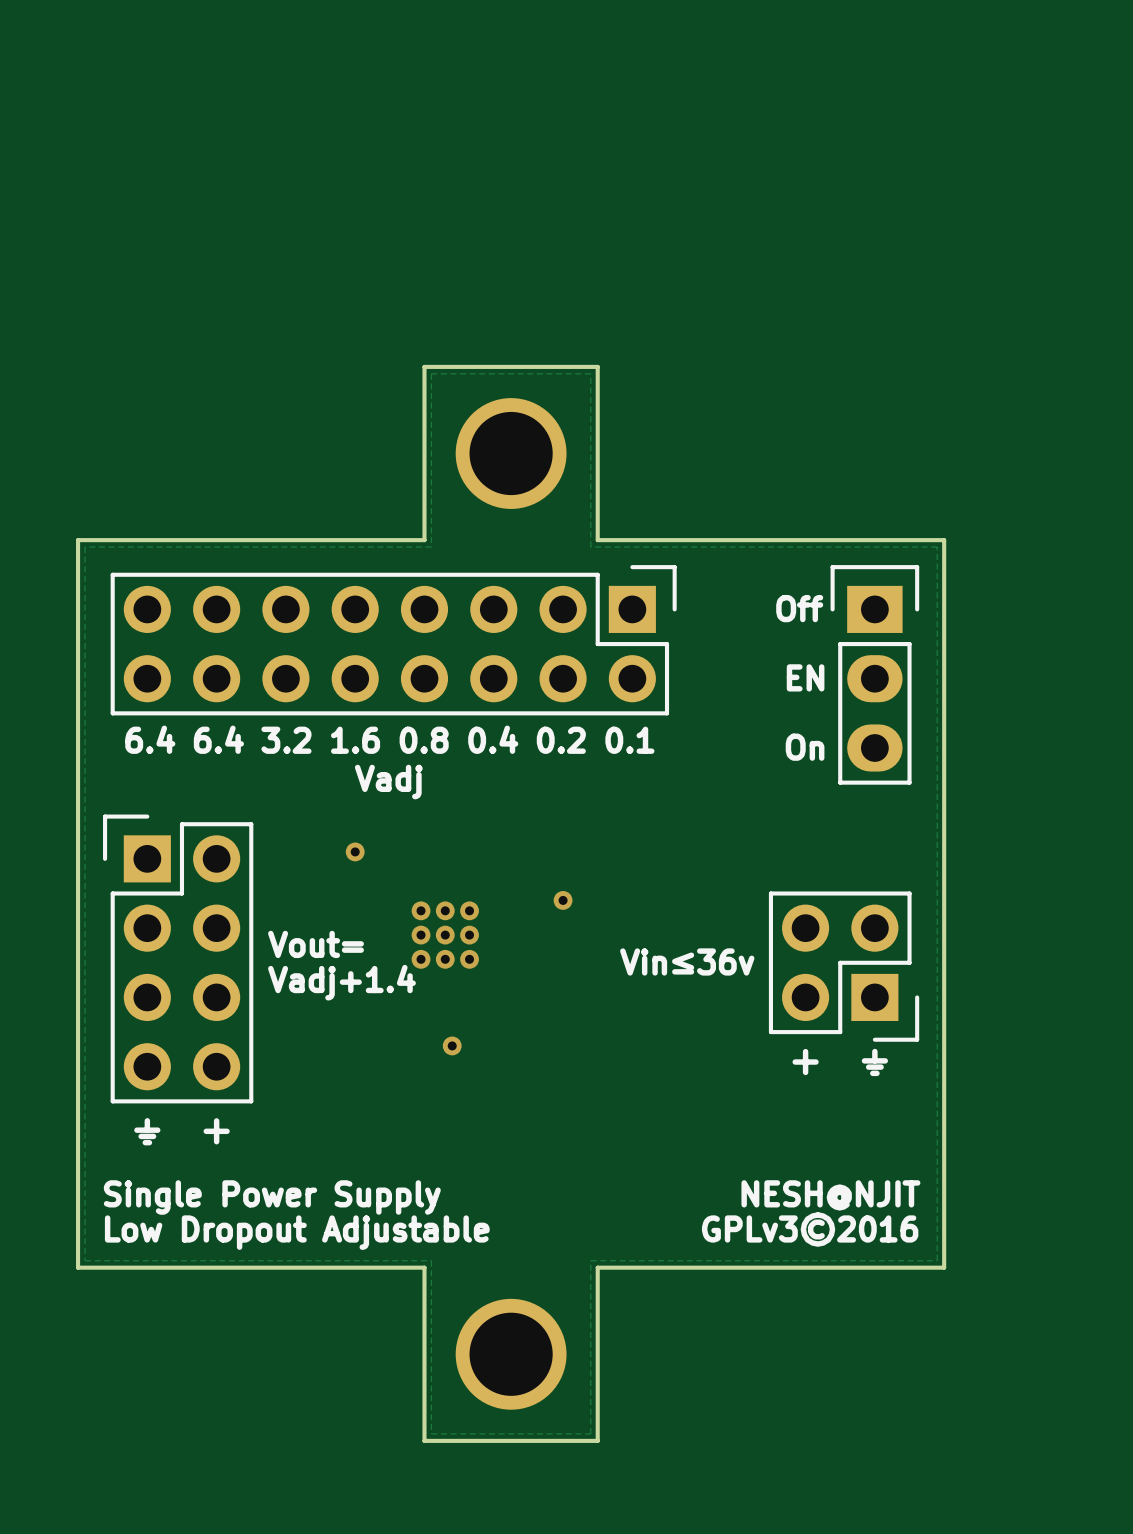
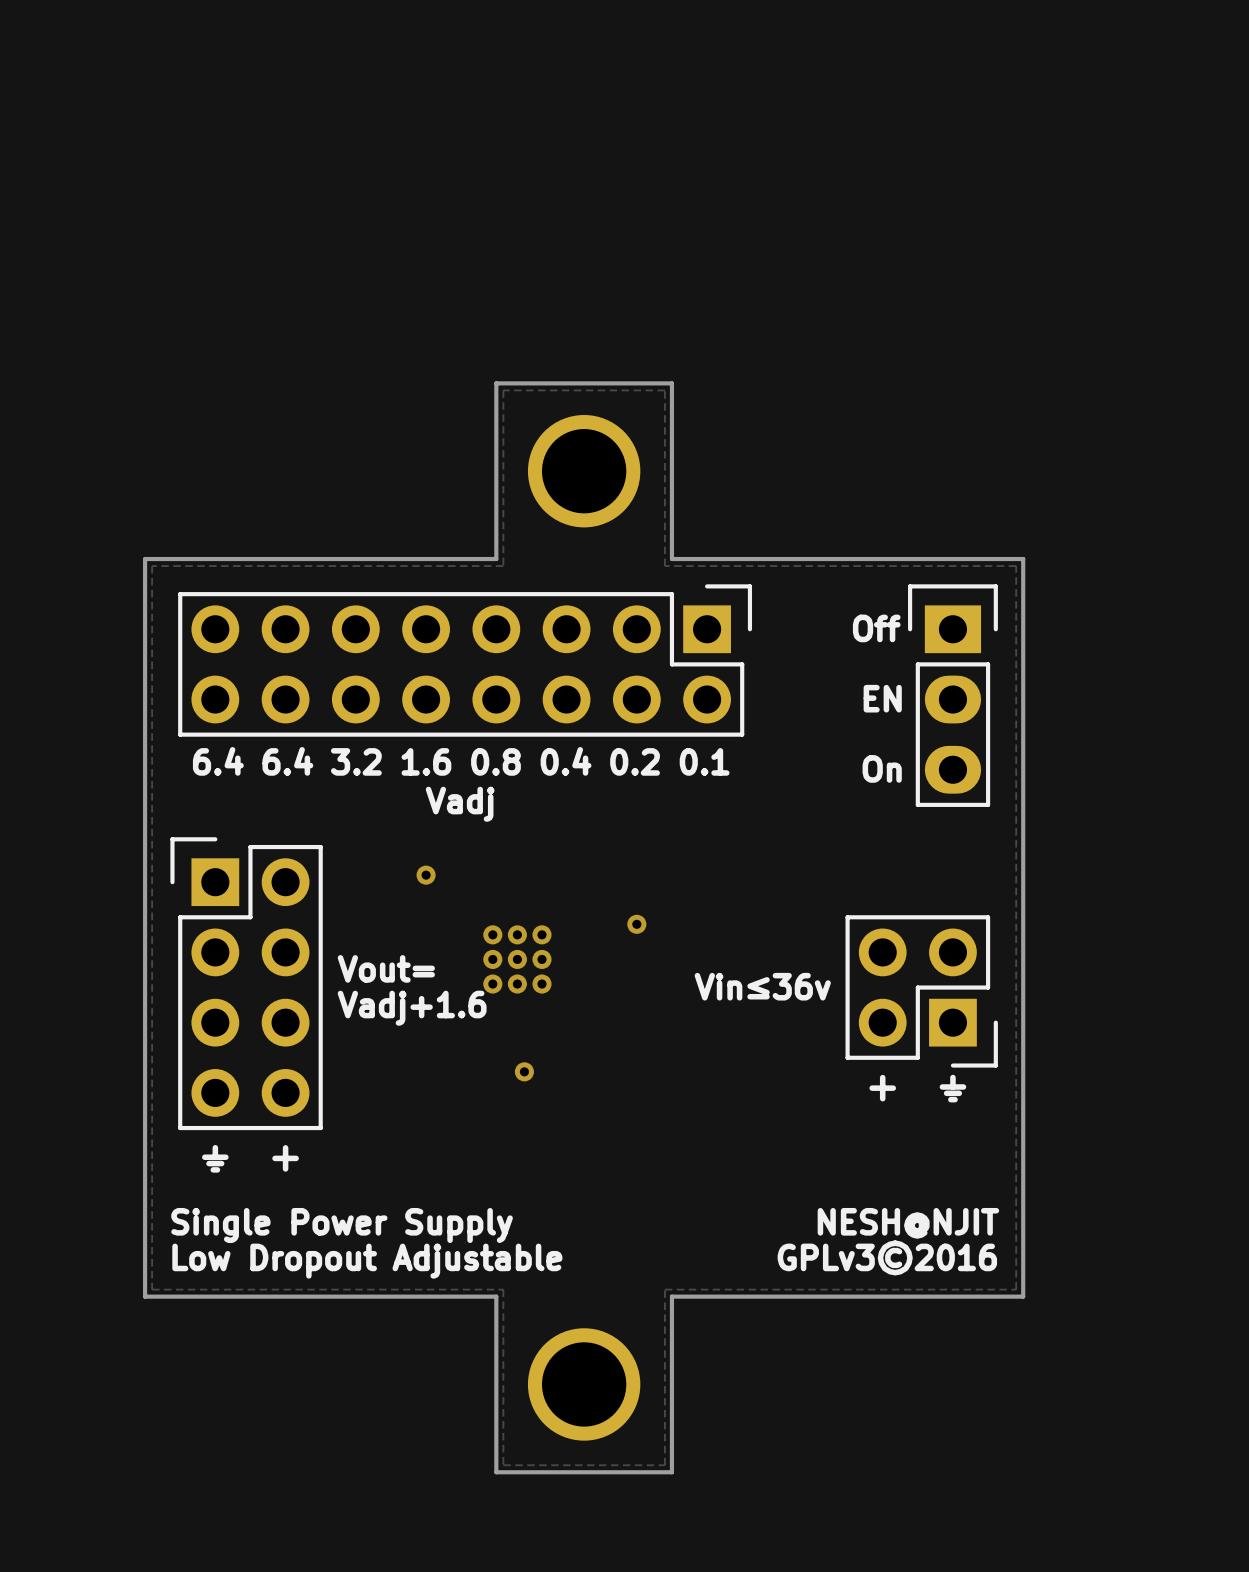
text: Vadj+1.4 (341, 982) -> Vadj+1.6 (412, 1008)

